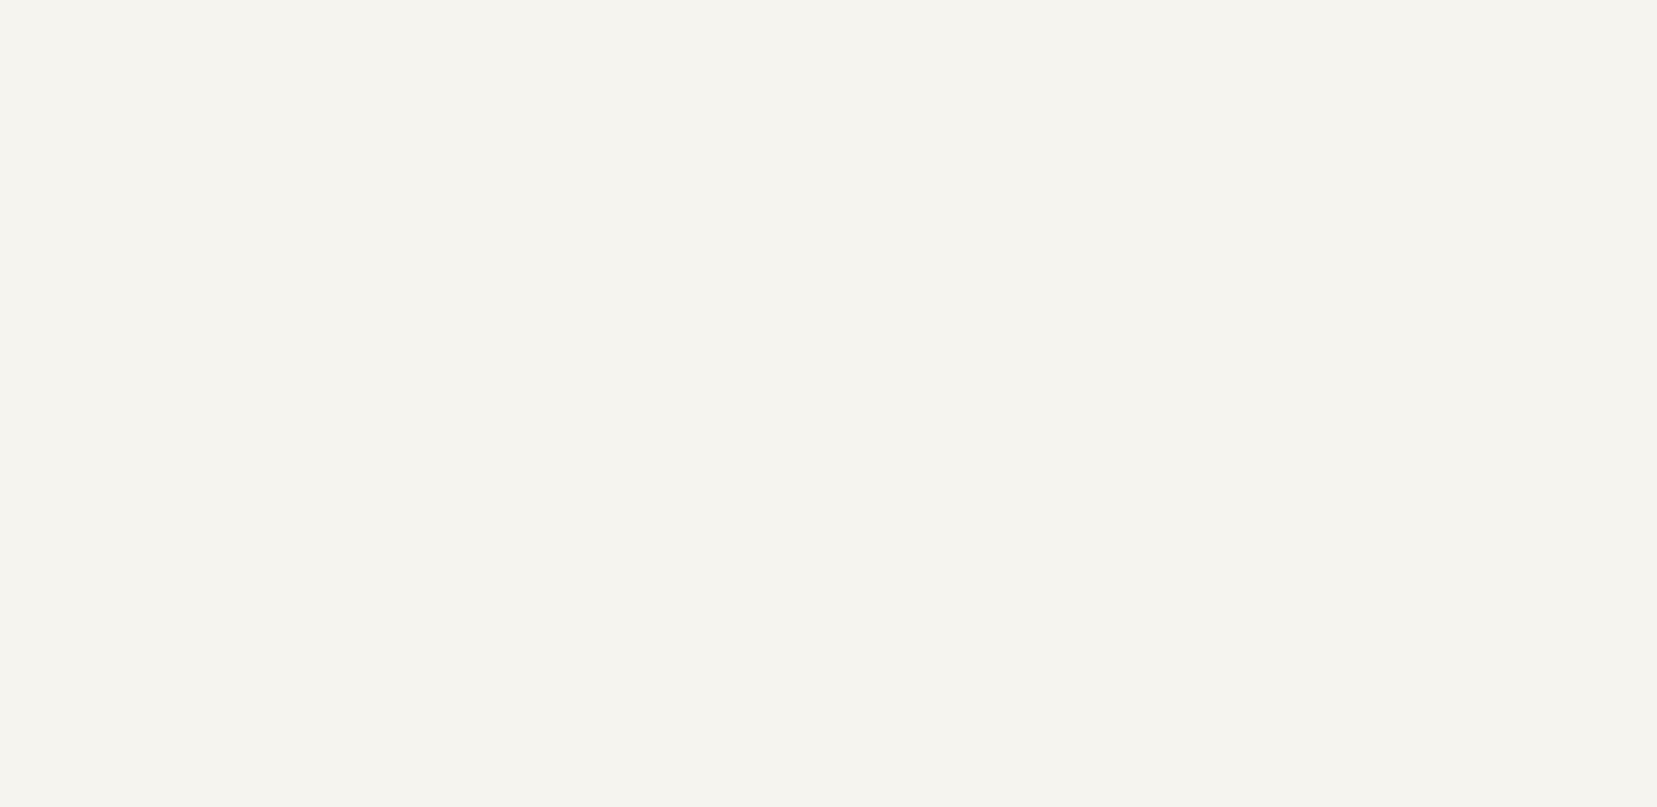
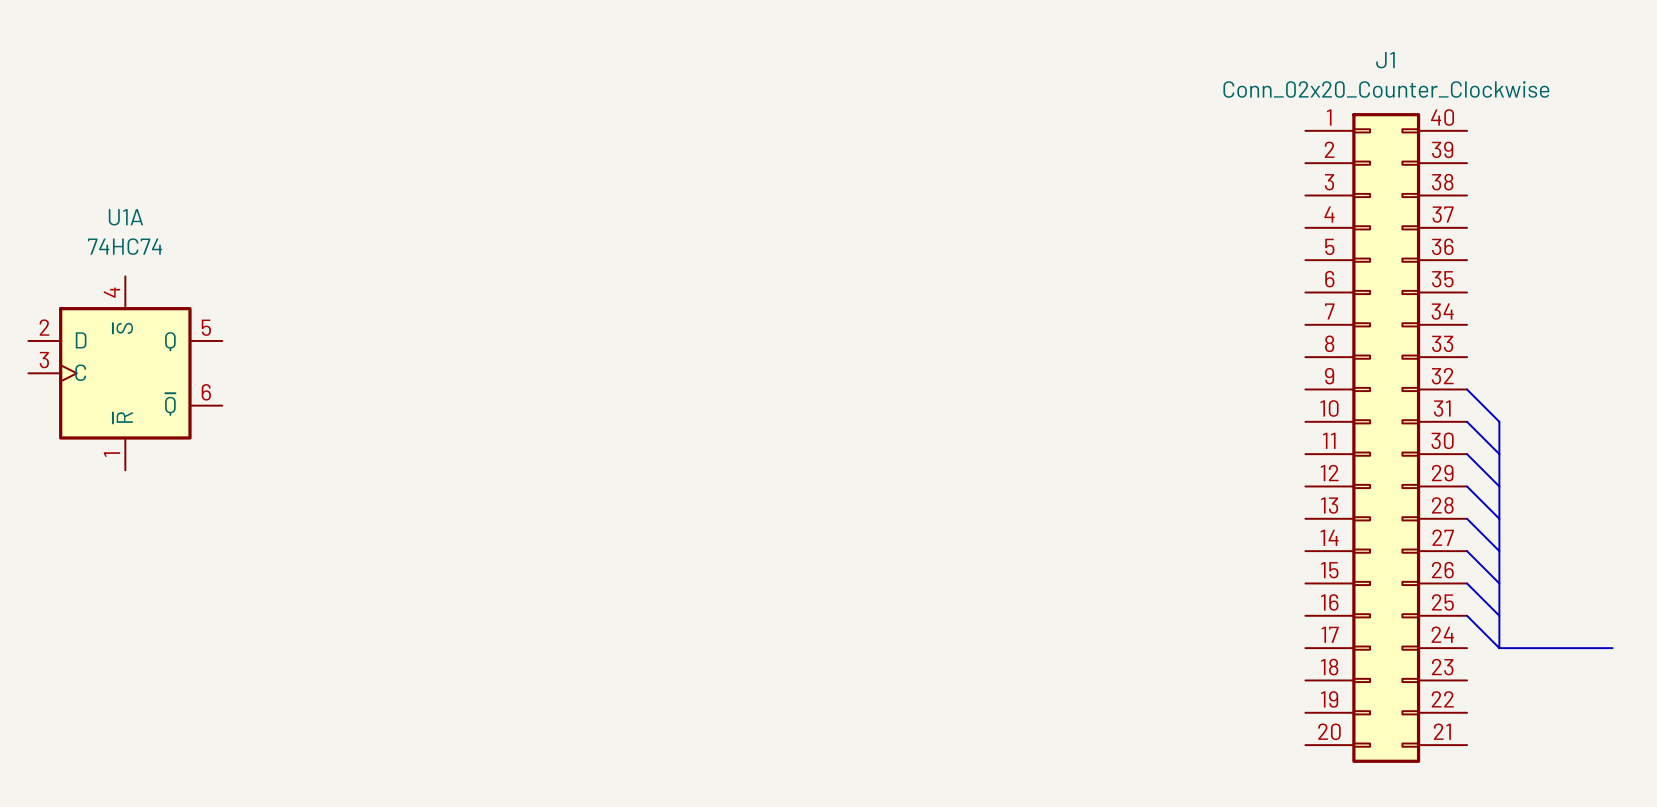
U1A: none -> 74HC74 (125, 373)
bus: none -> (1467, 389) (1499, 421) (1499, 648)
bus: none -> (1467, 421) (1499, 454)
J1: none -> Conn_02x20_Counter_Clockwise (1386, 437)
bus: none -> (1467, 454) (1499, 486)
bus: none -> (1467, 486) (1499, 518)
bus: none -> (1467, 518) (1499, 551)
bus: none -> (1467, 551) (1499, 583)
bus: none -> (1467, 583) (1499, 615)
bus: none -> (1467, 615) (1499, 648)
bus: none -> (1499, 648) (1612, 648)

